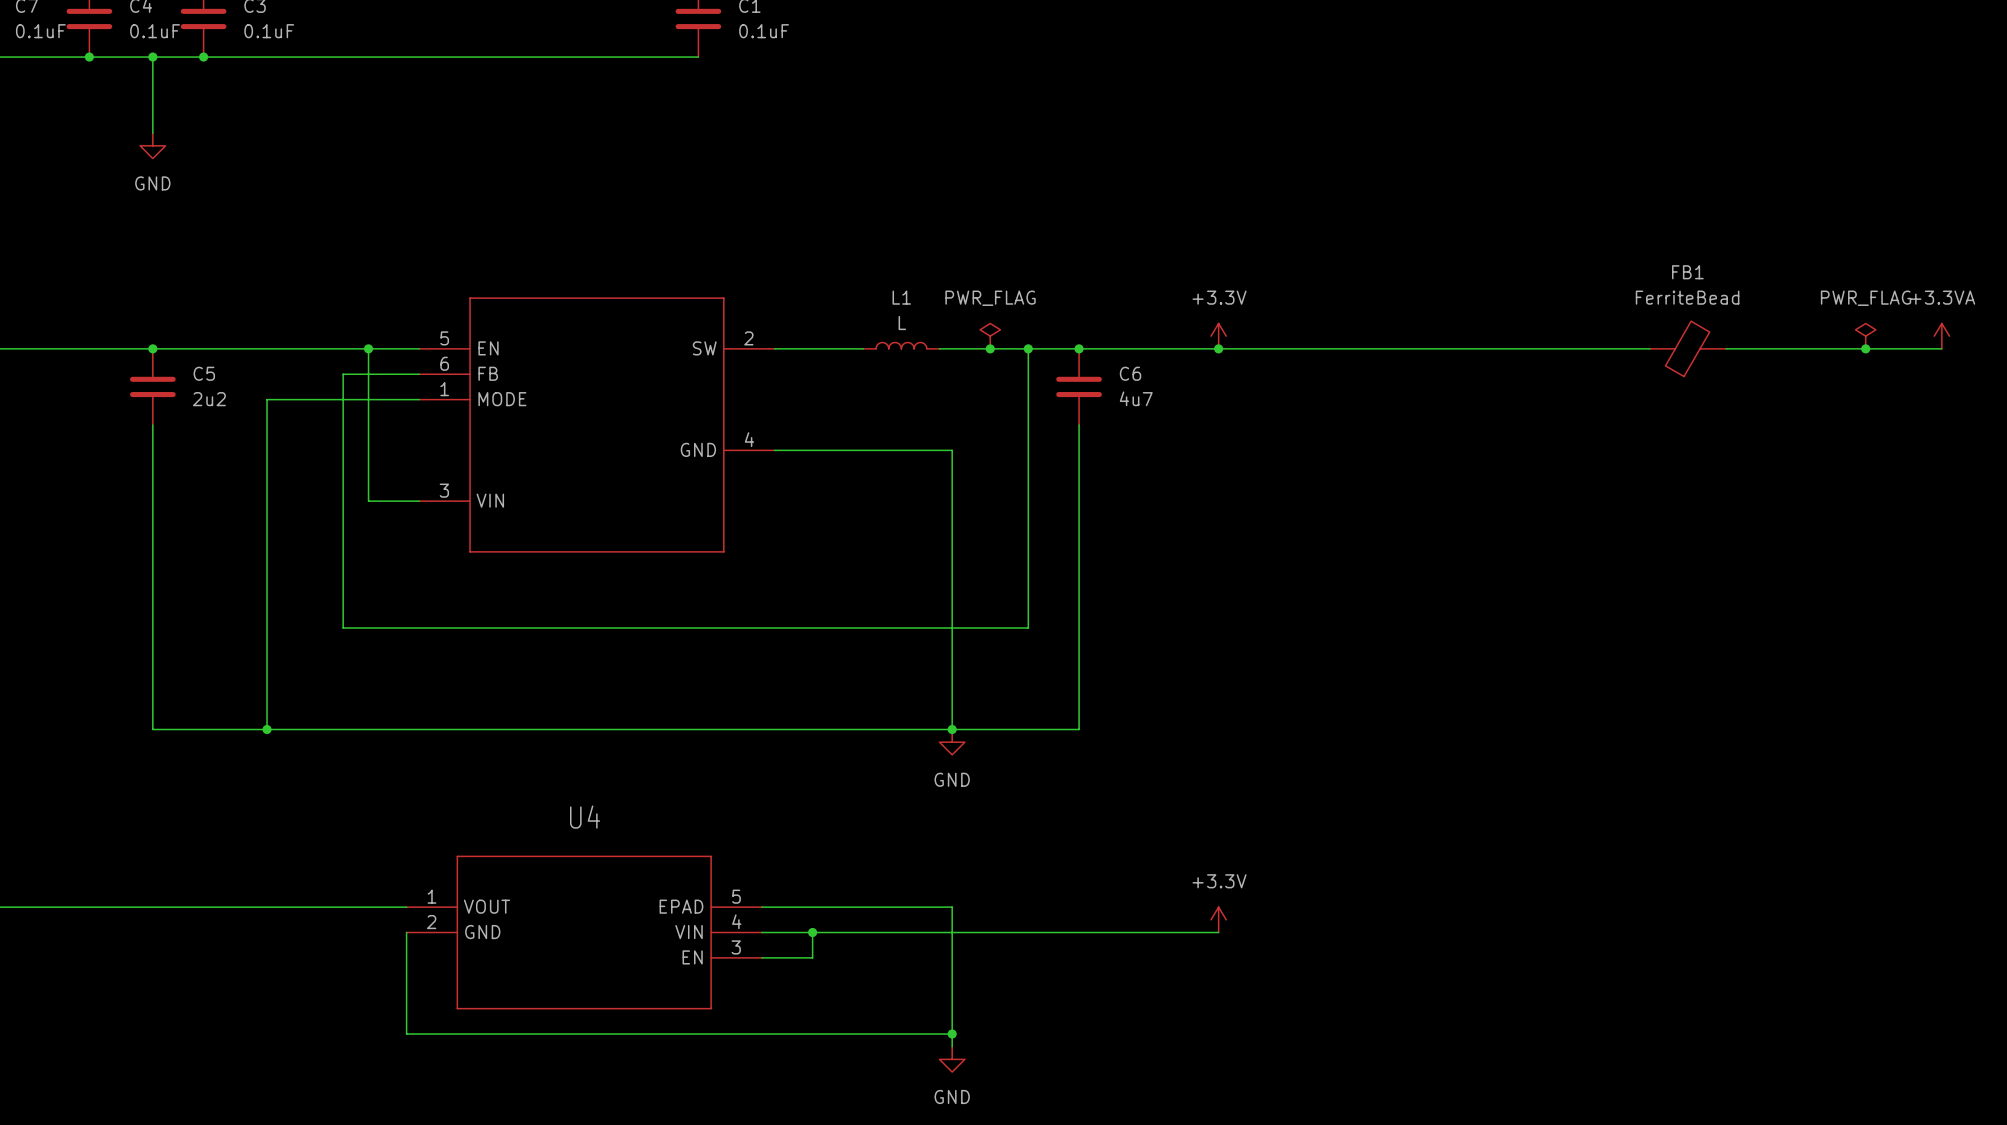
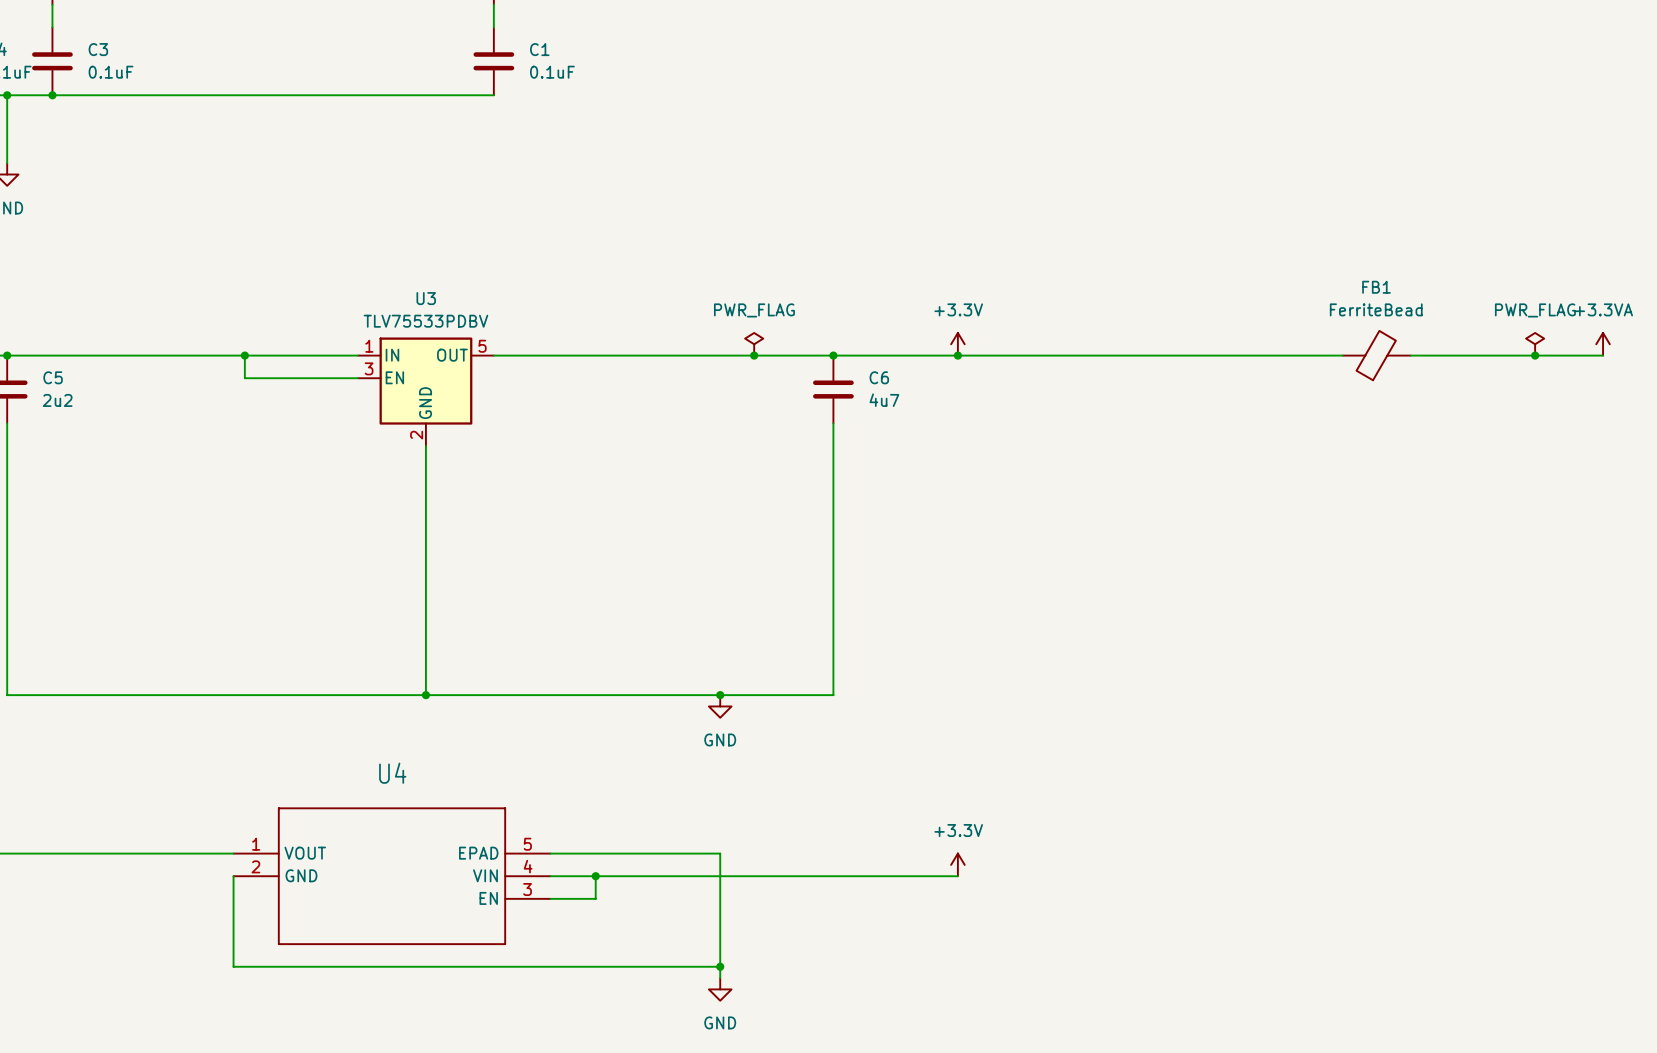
L1: L (901, 345) -> none
wire: (368, 348) (368, 501) (419, 501) -> none
junction position: (368, 348) -> (244, 355)
wire: none -> (358, 355) (244, 355) (244, 378) (358, 378)
wire: none -> (641, 355) (708, 355)
wire: (1028, 348) (1028, 628) (343, 628) (343, 374) (419, 374) -> none
junction: (1028, 348) -> none
U3: none -> TLV75533PDBV (425, 391)
wire: (419, 399) (267, 399) (267, 729) -> none
part: (596, 424) -> none
wire: none -> (425, 446) (425, 695)
wire: (774, 450) (952, 450) (952, 729) -> none
junction: (267, 729) -> none
junction: none -> (425, 695)

